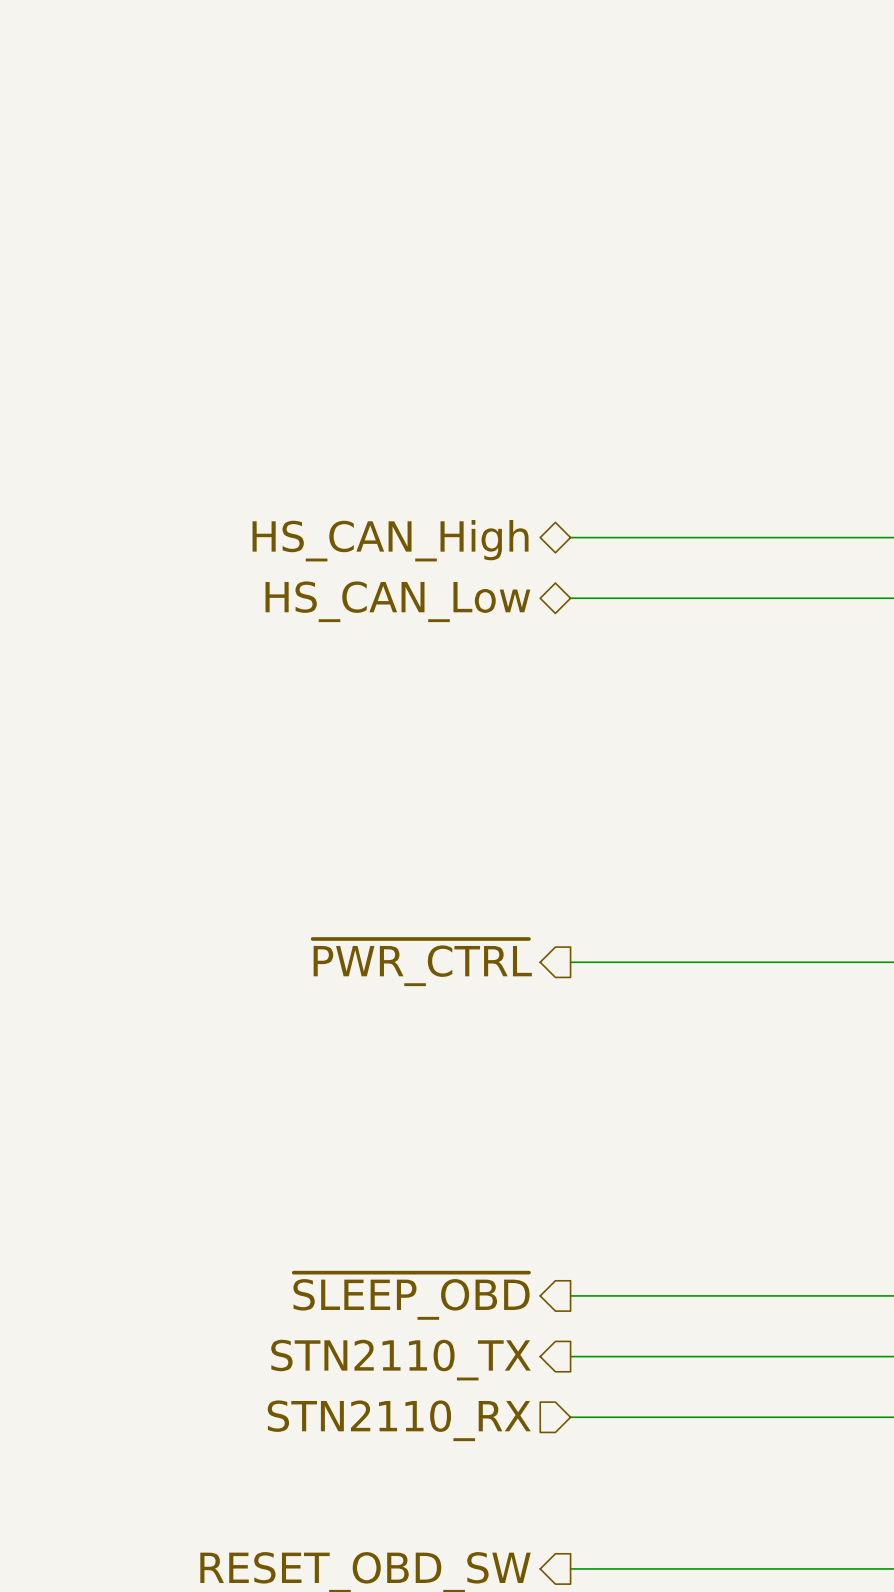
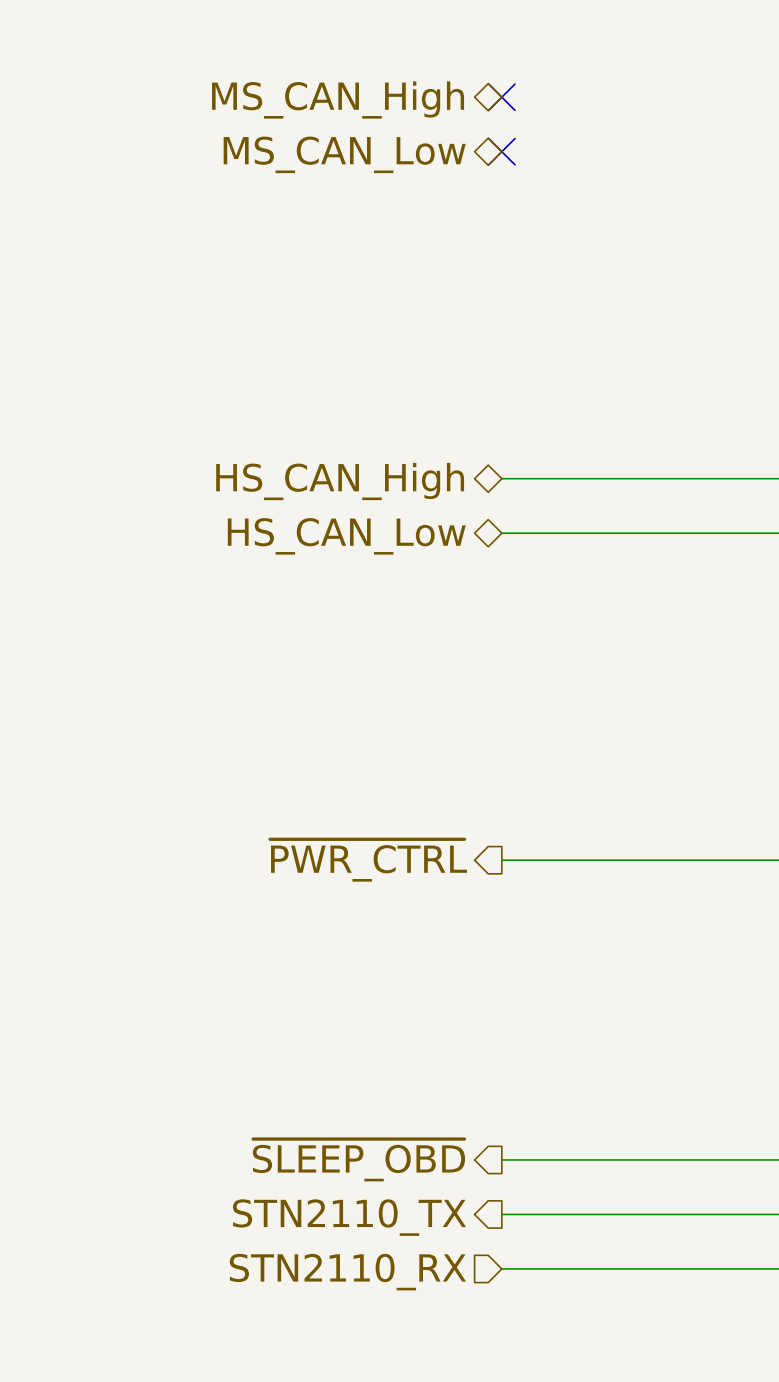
no-connect mark: none -> (501, 97)
hierarchical label: none -> MS_CAN_High (338, 100)
no-connect mark: none -> (501, 151)
hierarchical label: none -> MS_CAN_Low (344, 154)

